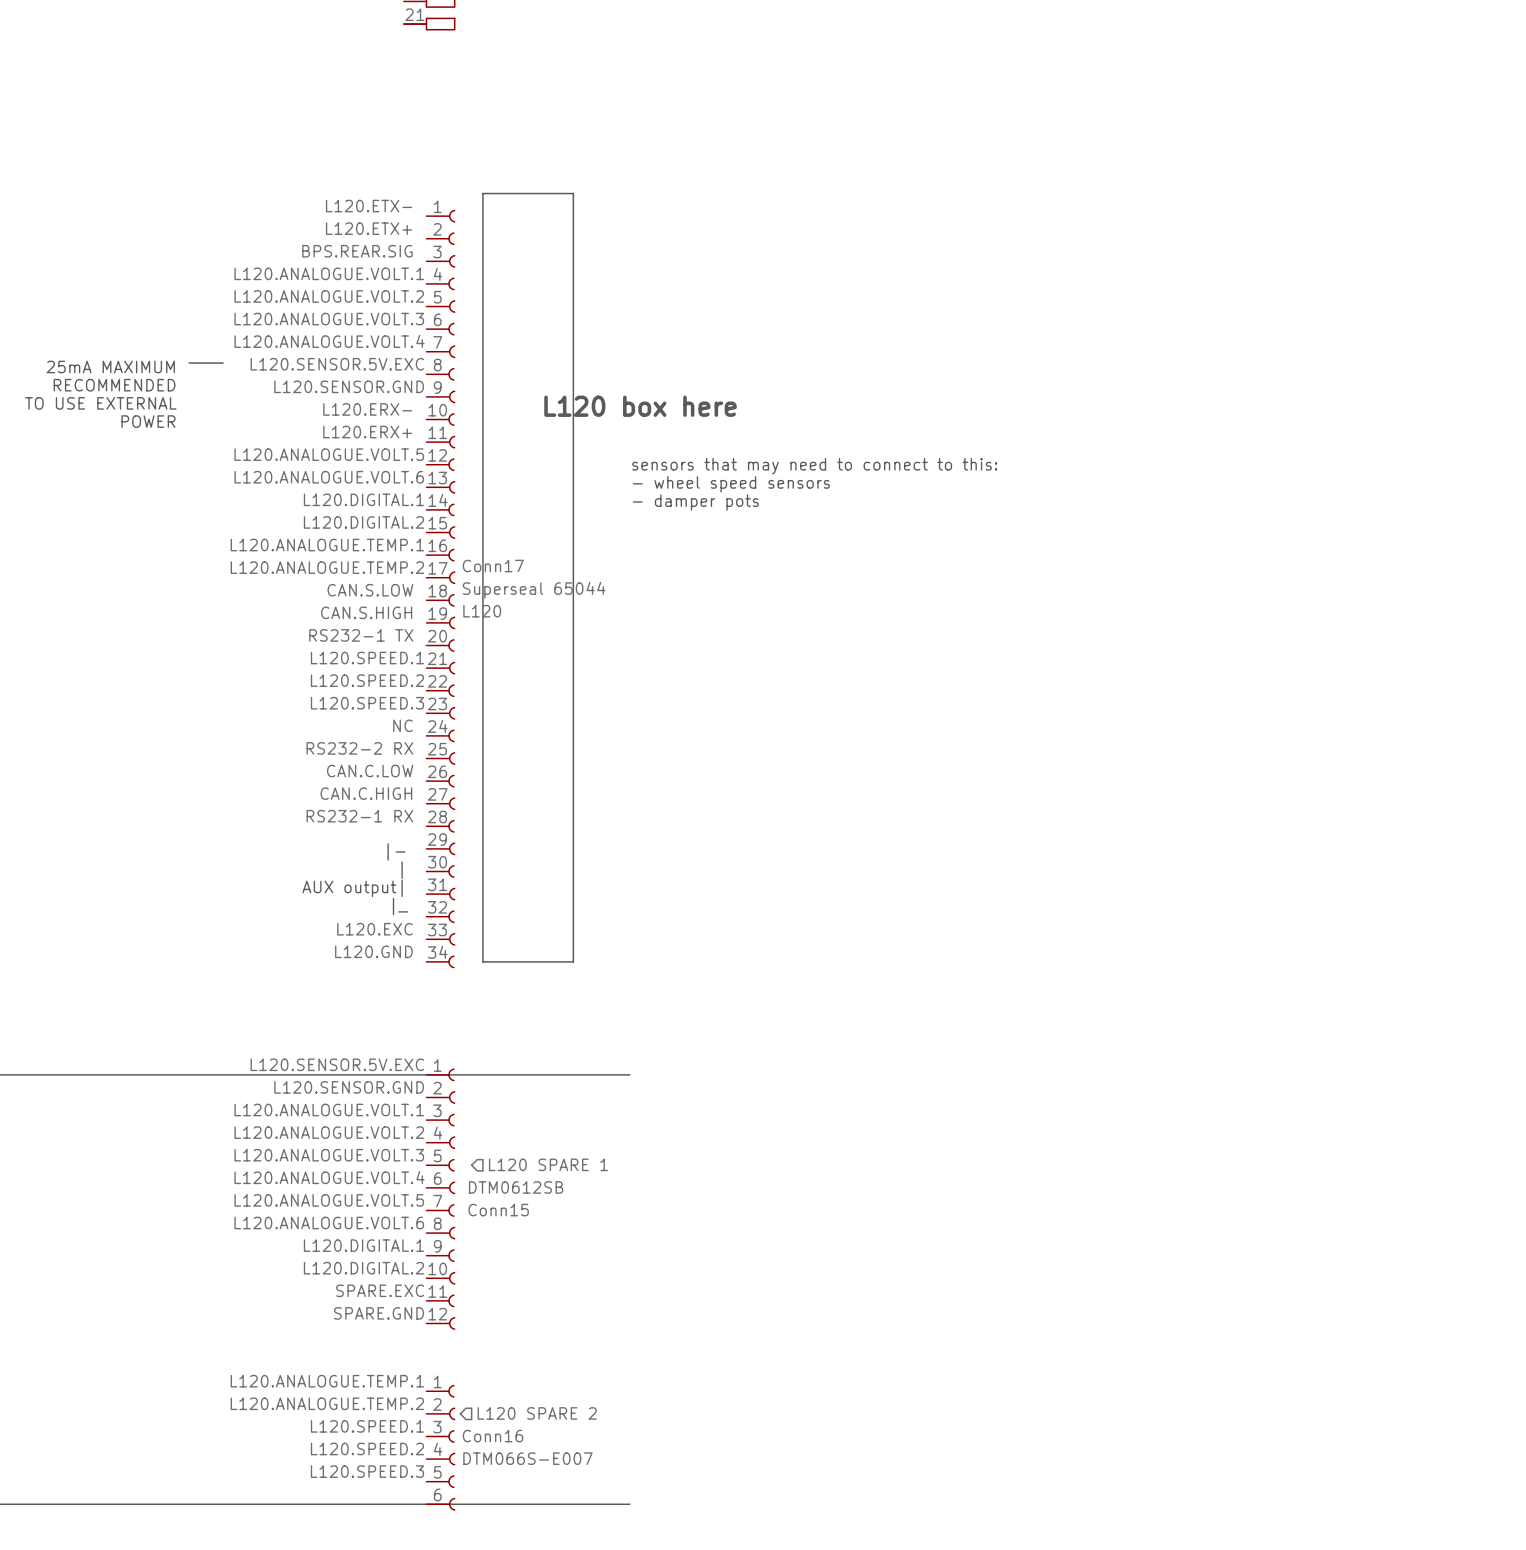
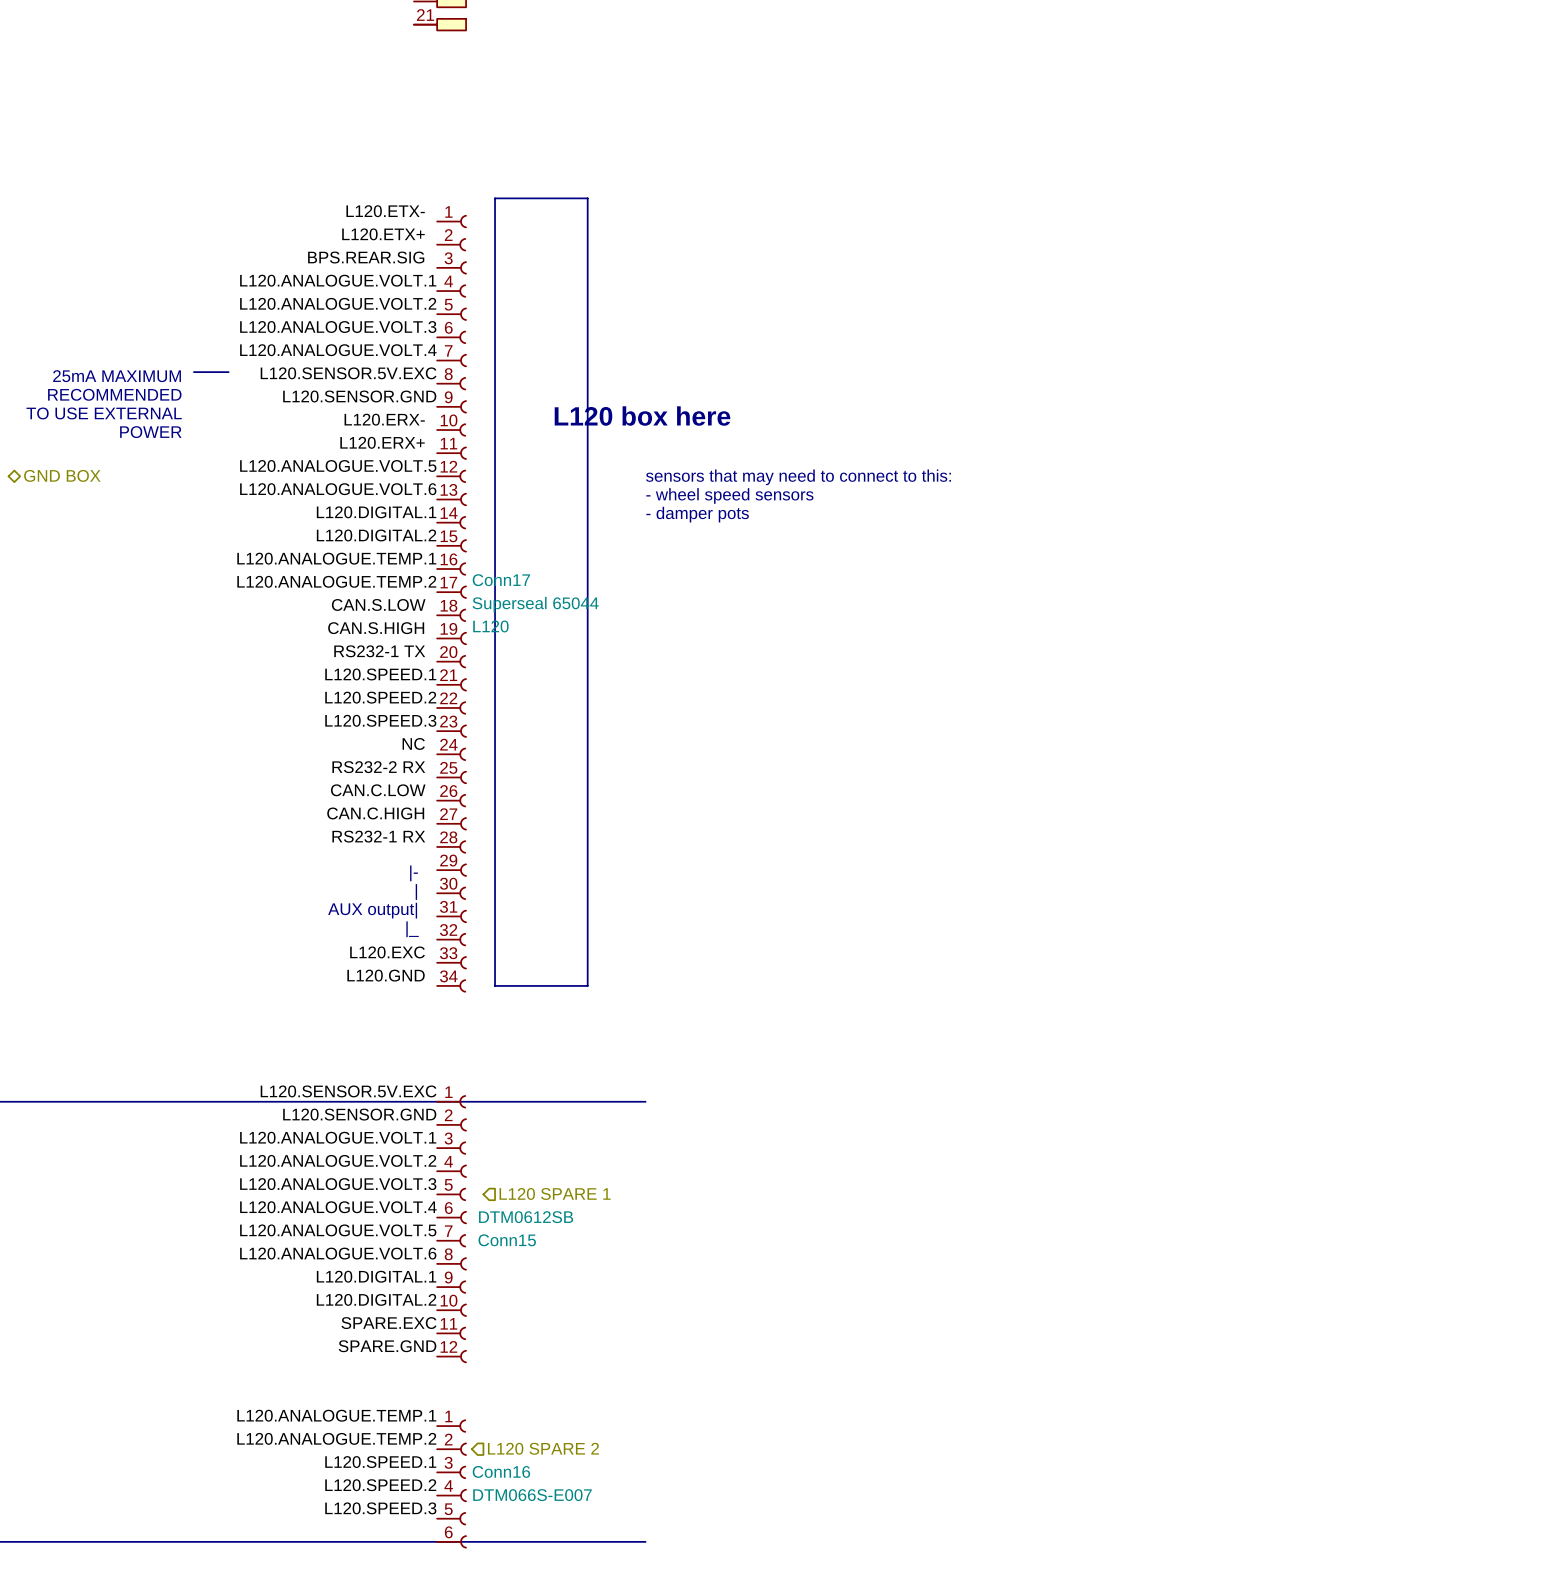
hierarchical label: none -> GND BOX (62, 475)

